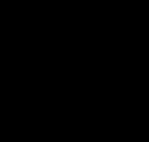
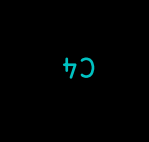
text: none -> C4 (78, 68)

